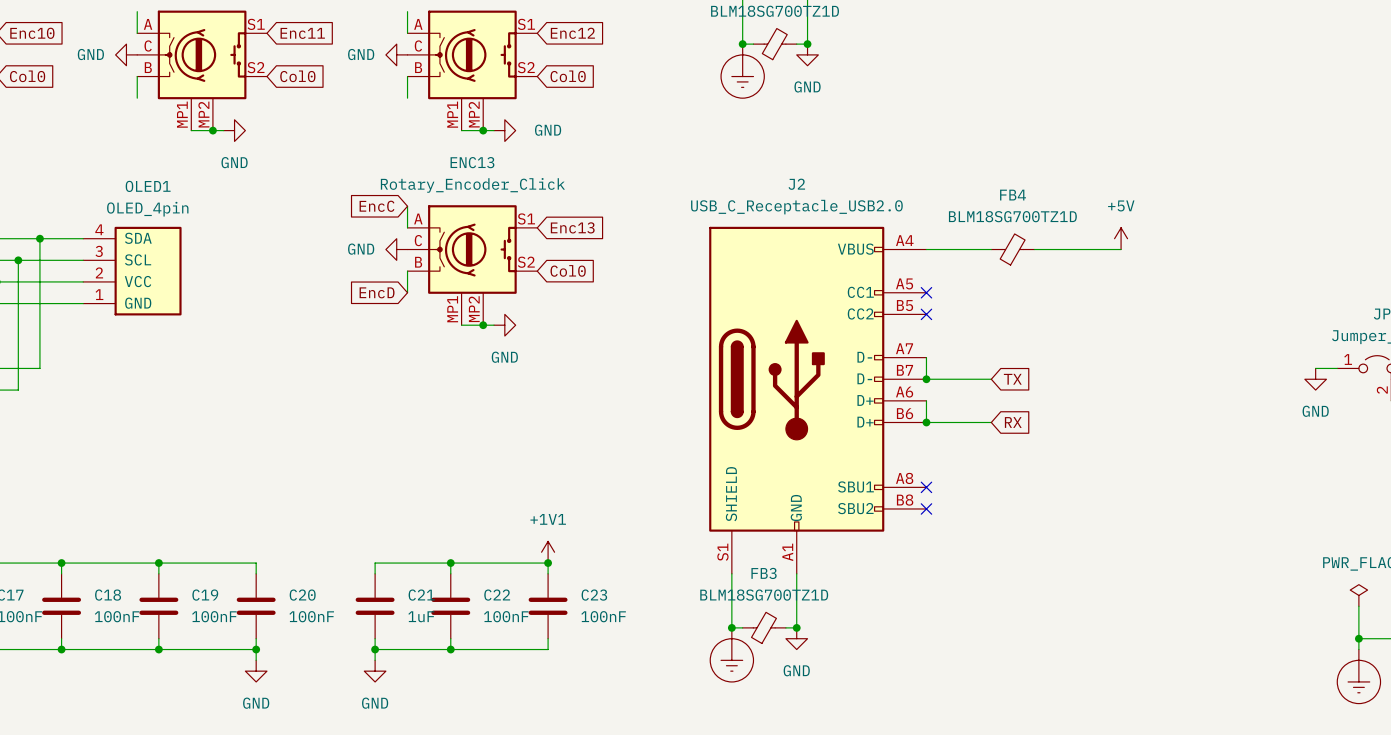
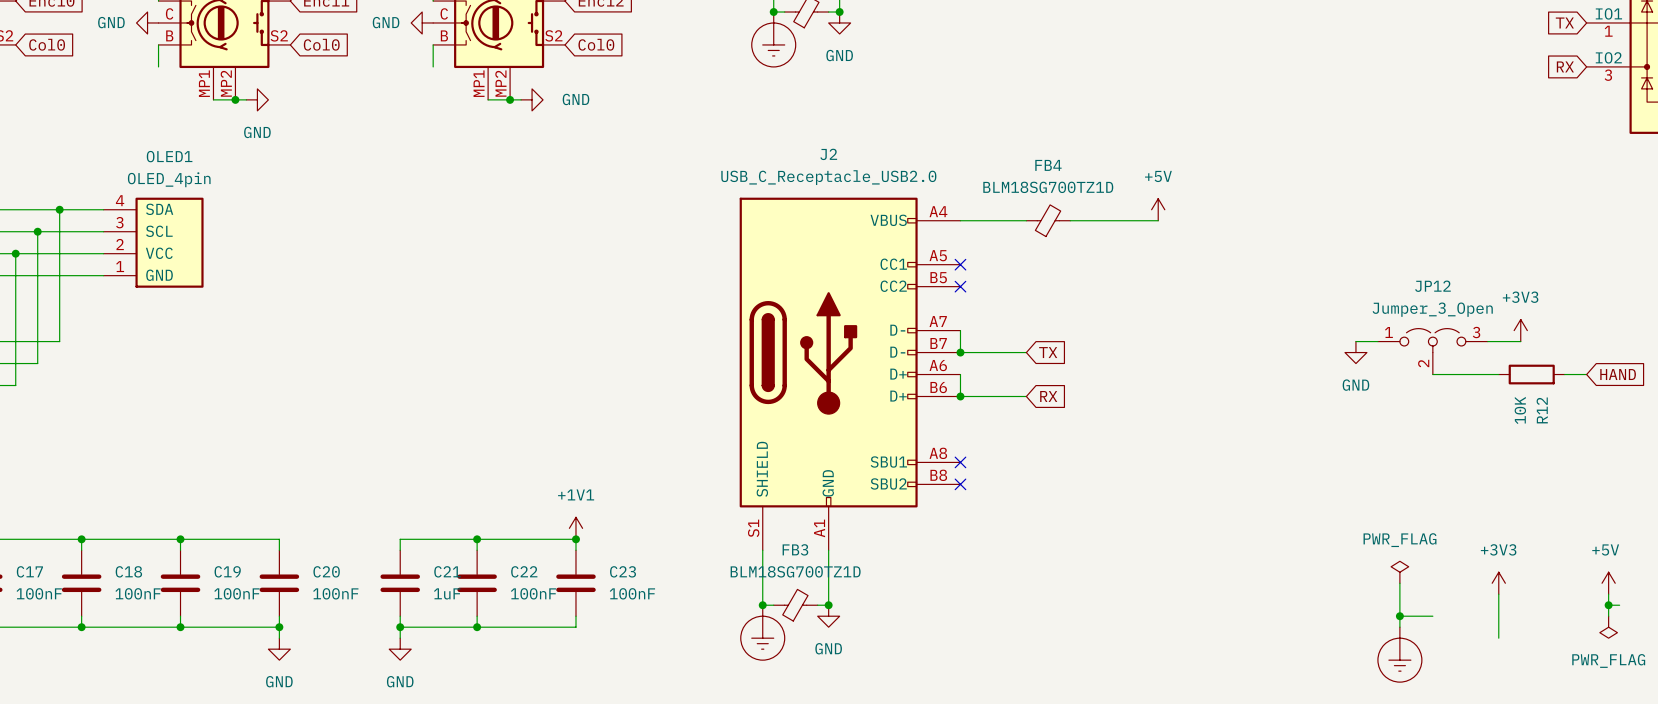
global label: EncC (377, 206) -> none
wire: (407, 206) (407, 227) -> none
global label: Enc13 (572, 227) -> none
power symbol: GND (396, 249) -> none
ENC13: Rotary_Encoder_Click (472, 265) -> none
global label: Col0 (568, 270) -> none
wire: (407, 271) (407, 292) -> none
global label: EncD (377, 292) -> none
wire: (461, 325) (494, 325) -> none
junction: (483, 325) -> none
power symbol: GND (504, 325) -> none

